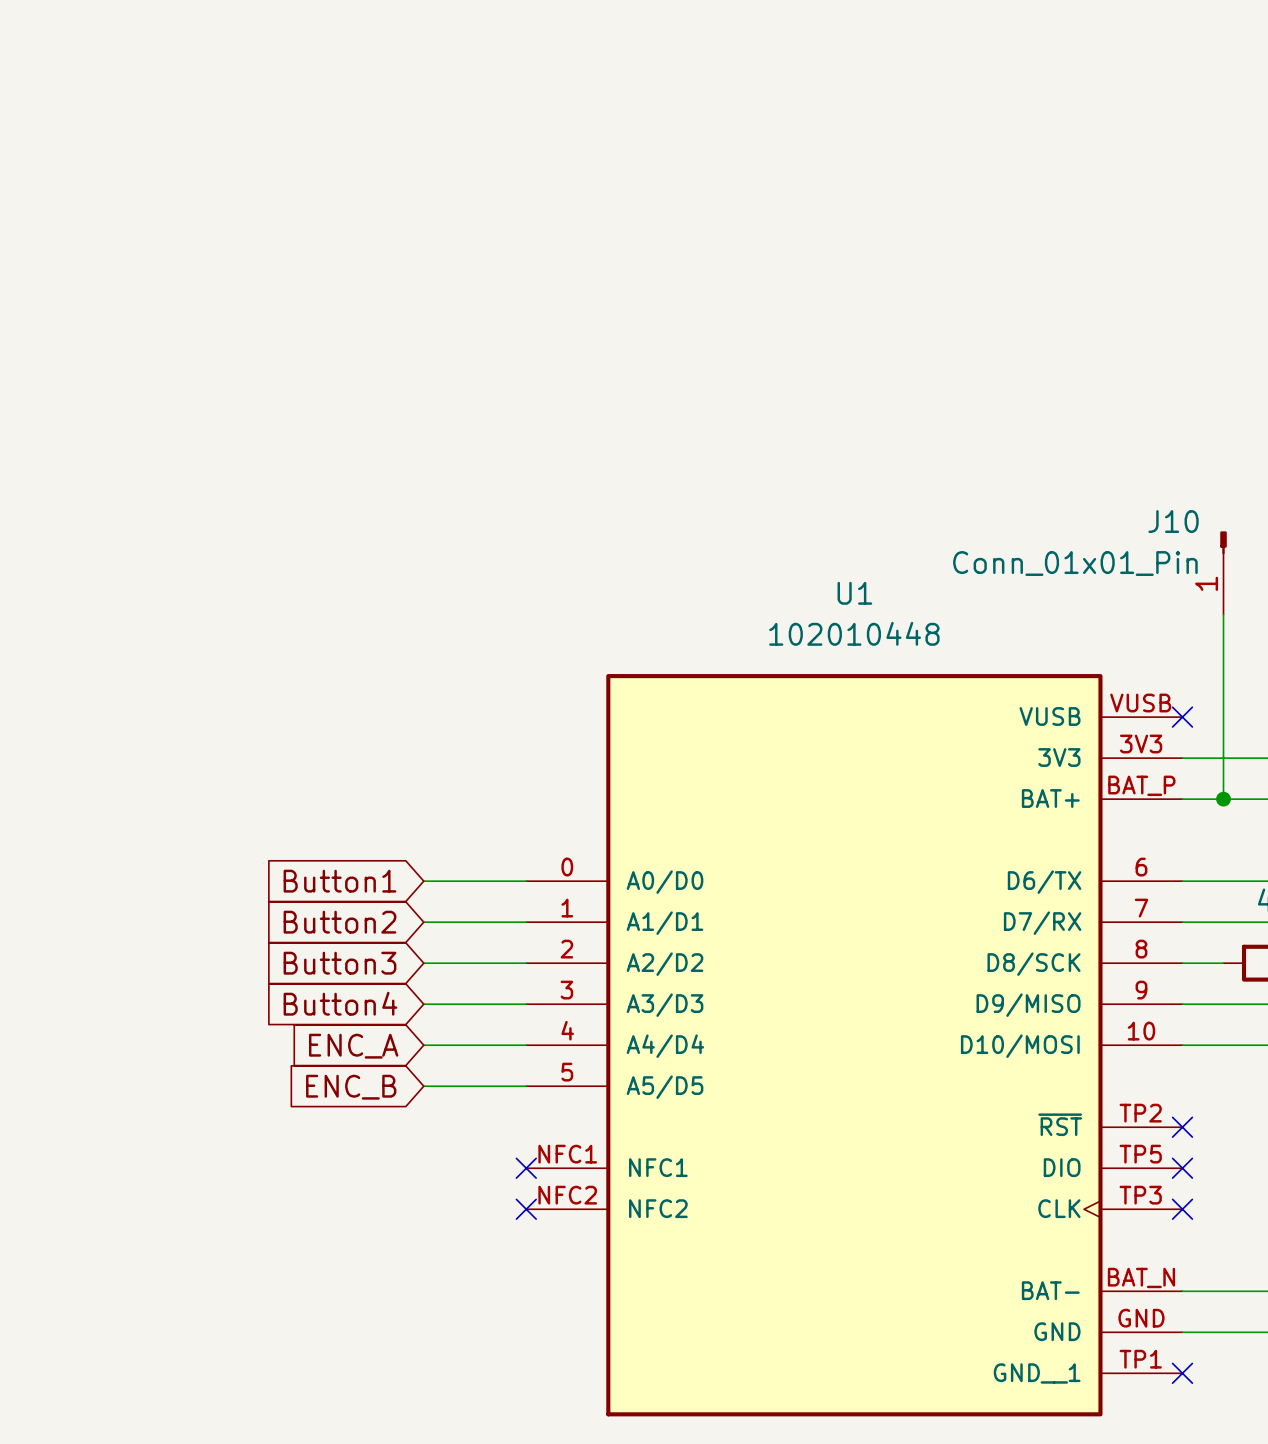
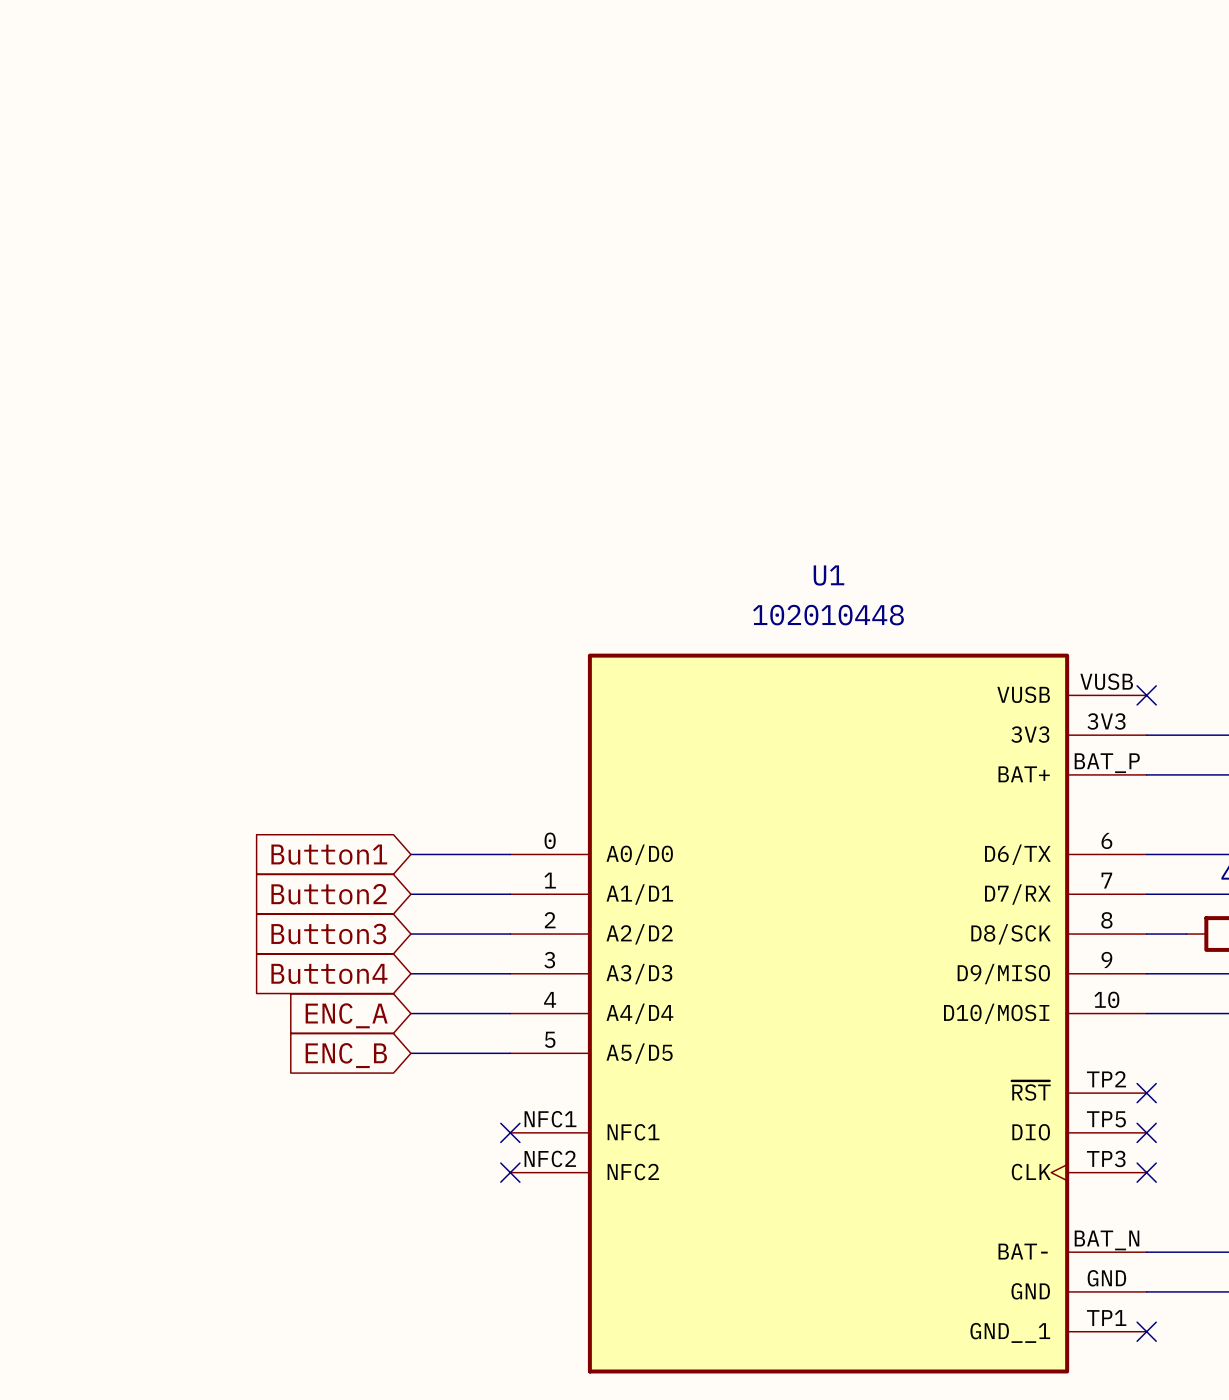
J10: Conn_01x01_Pin (1223, 572) -> none
wire: (1223, 614) (1223, 799) -> none
junction: (1223, 799) -> none

